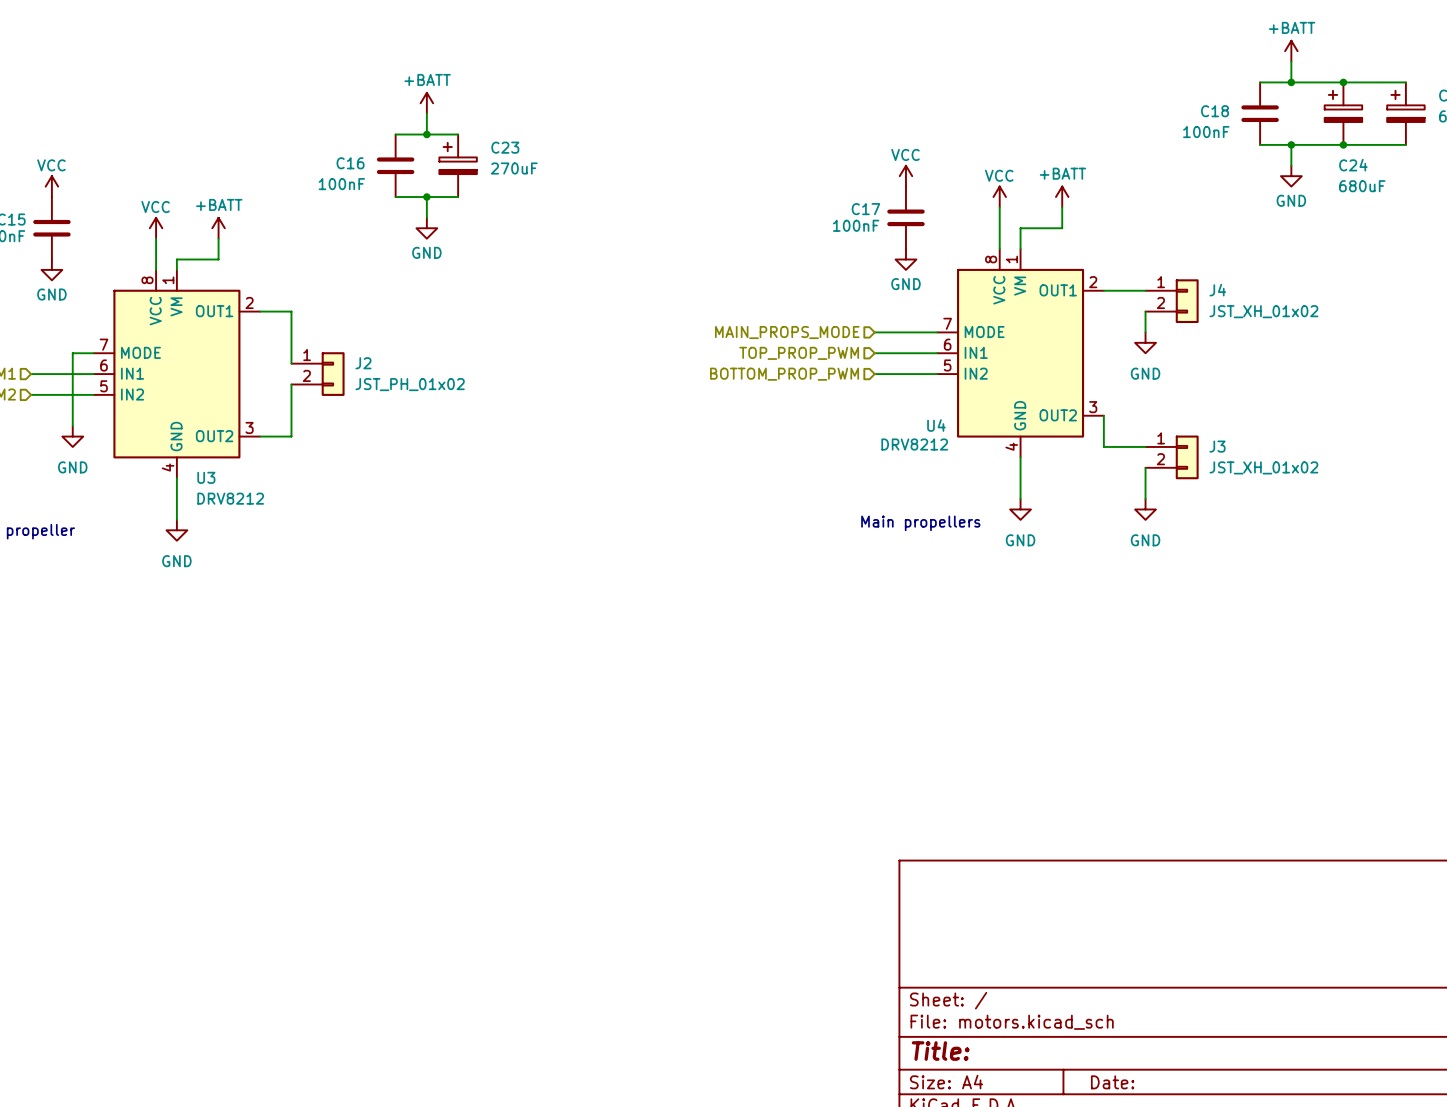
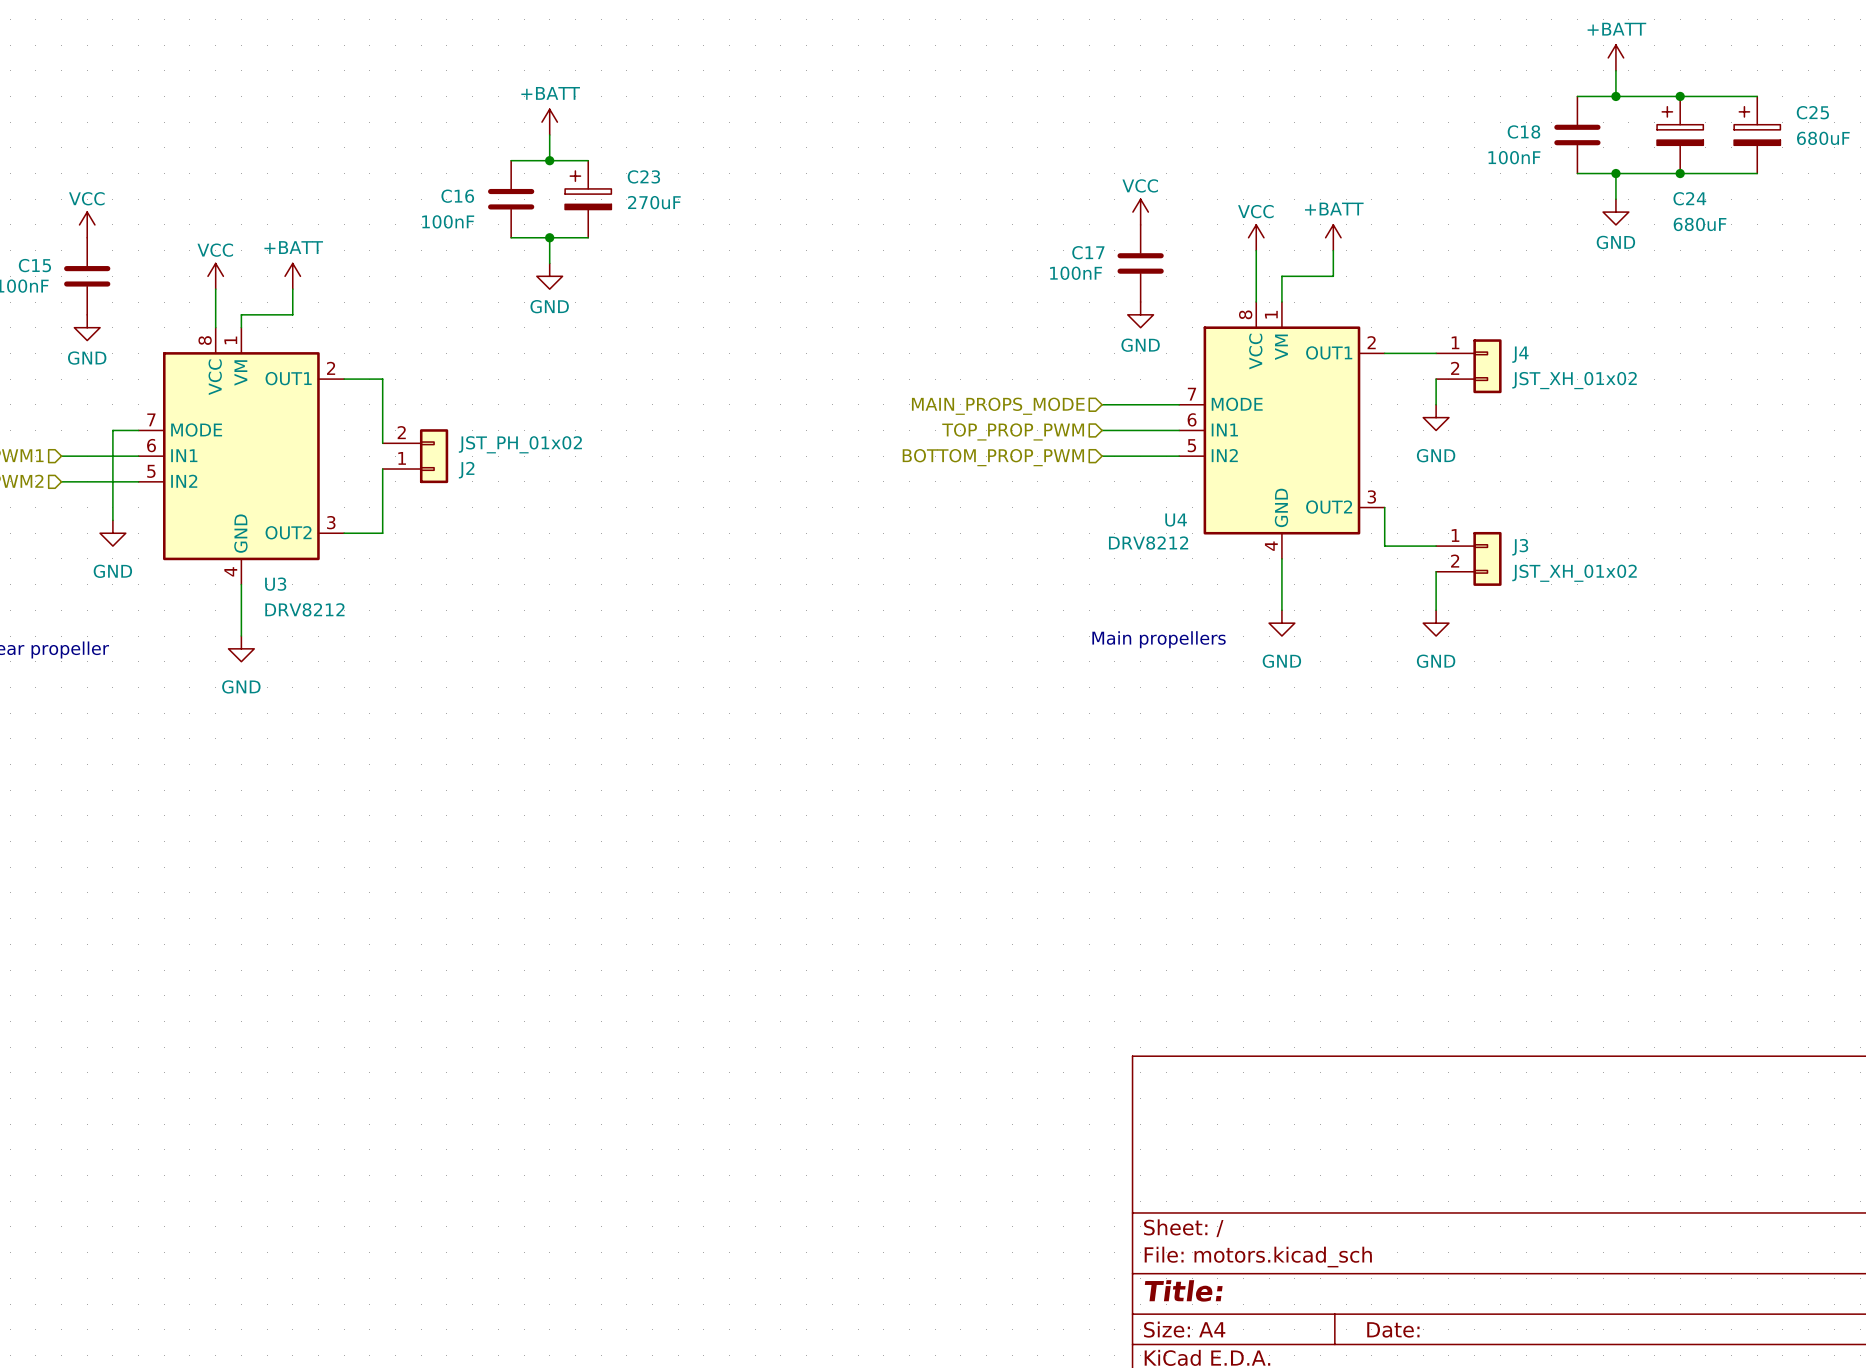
J2 flip: as is (333, 374) -> up-down (434, 456)

